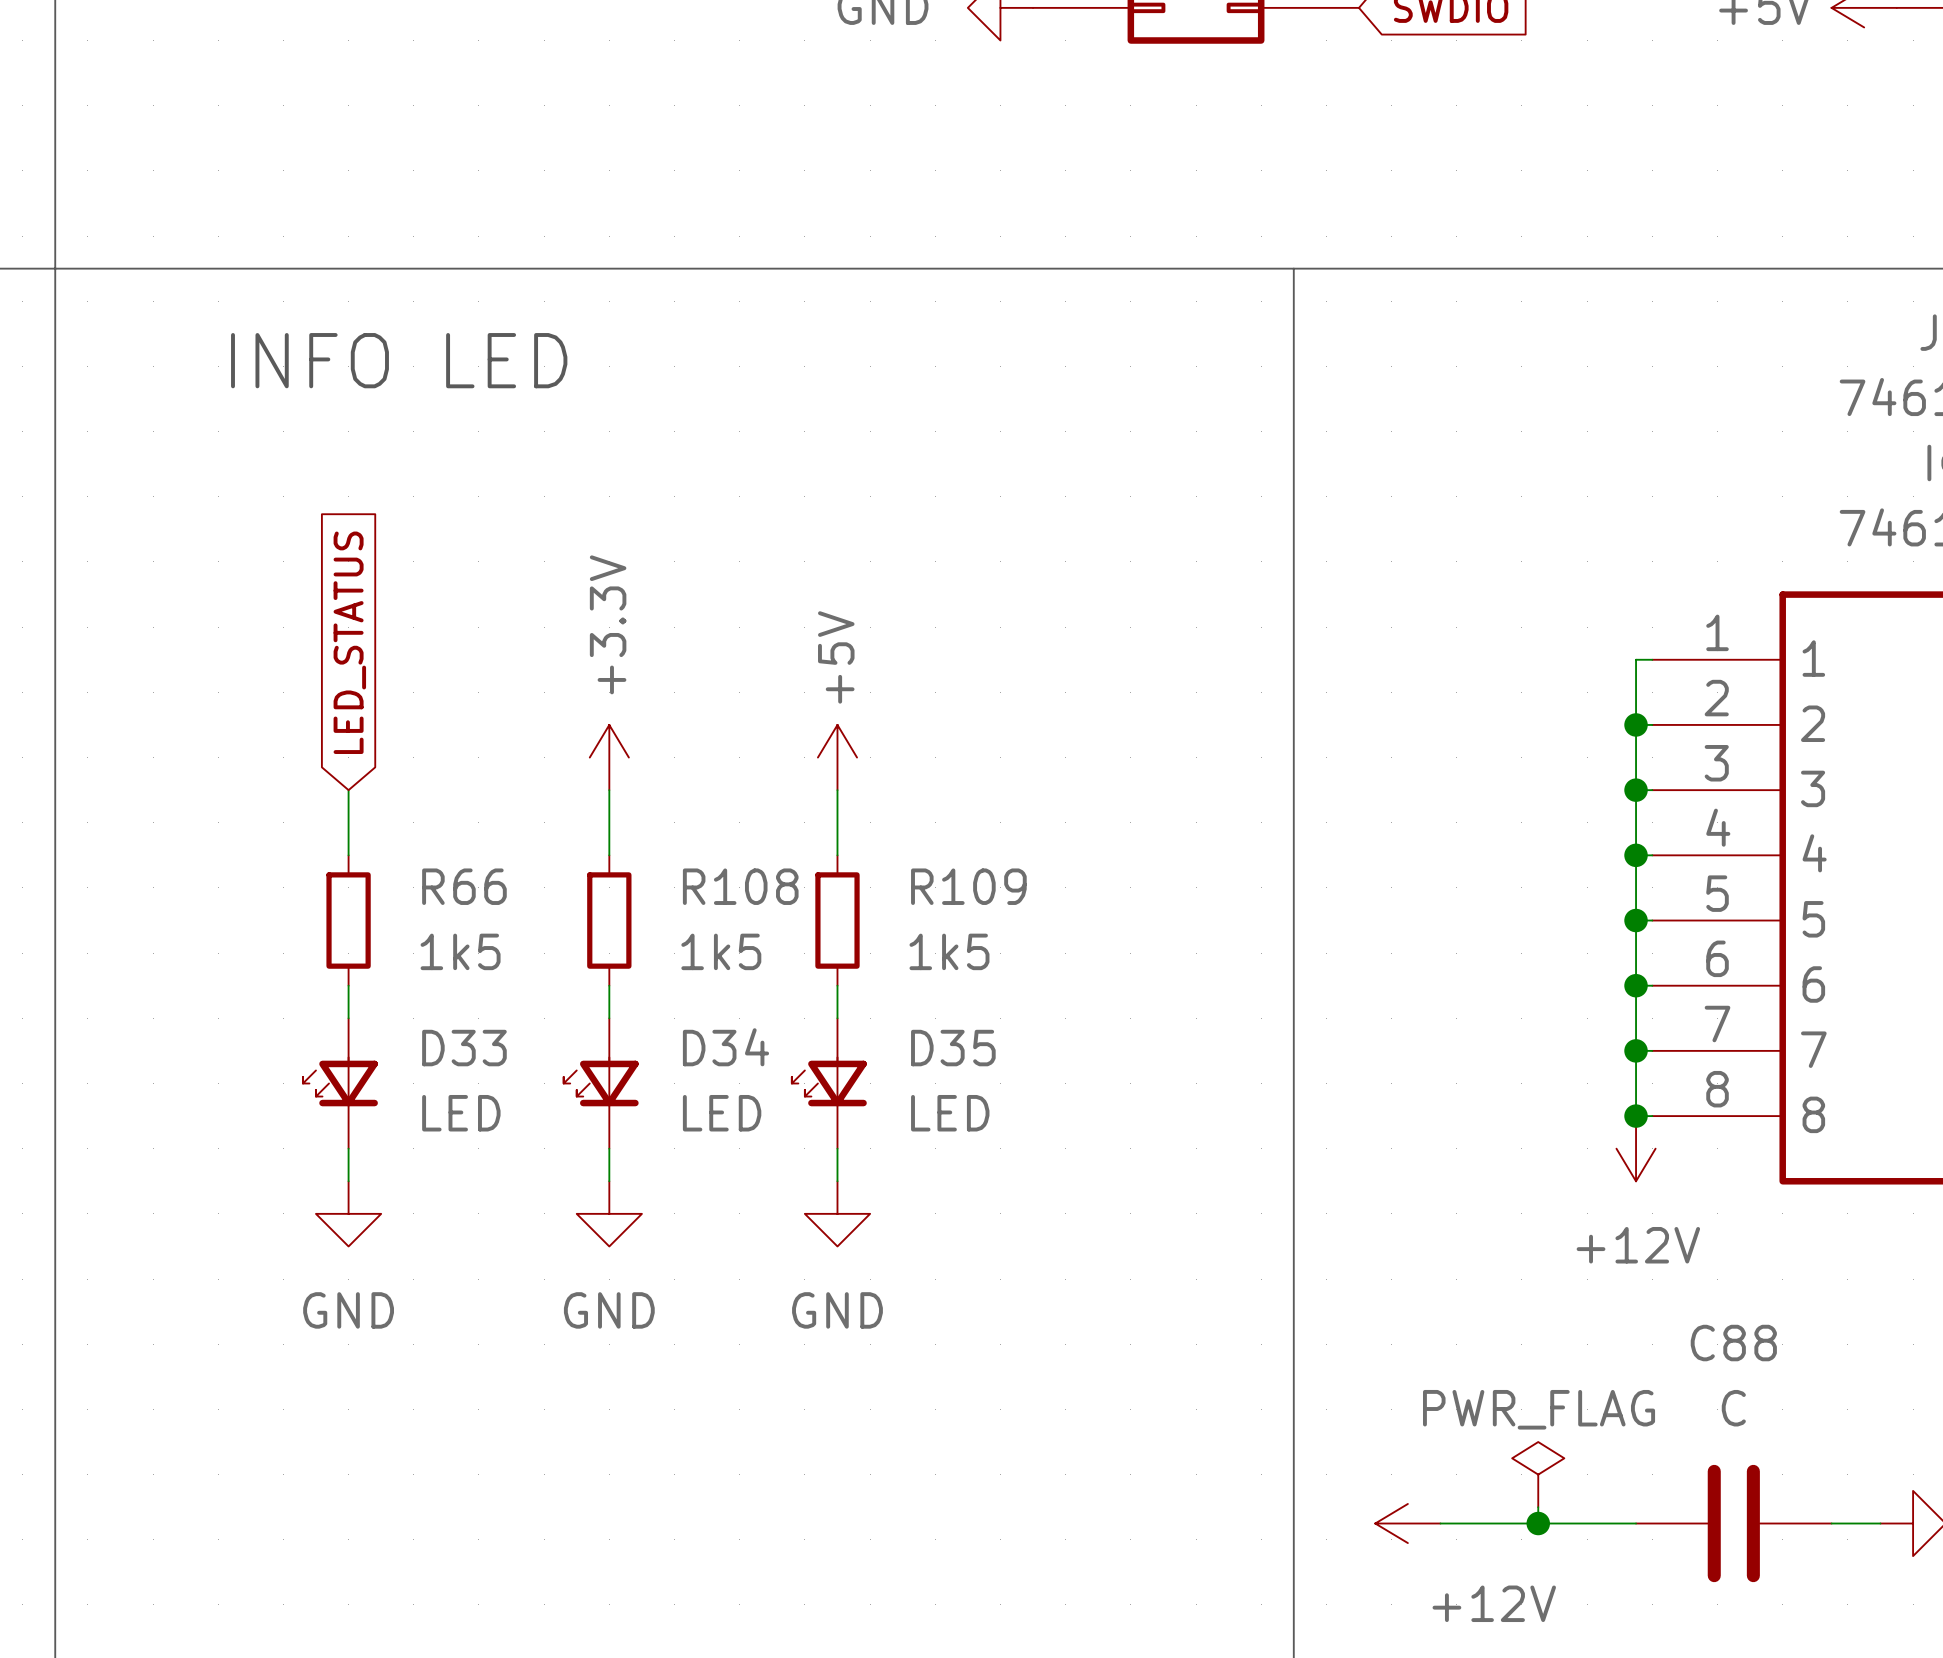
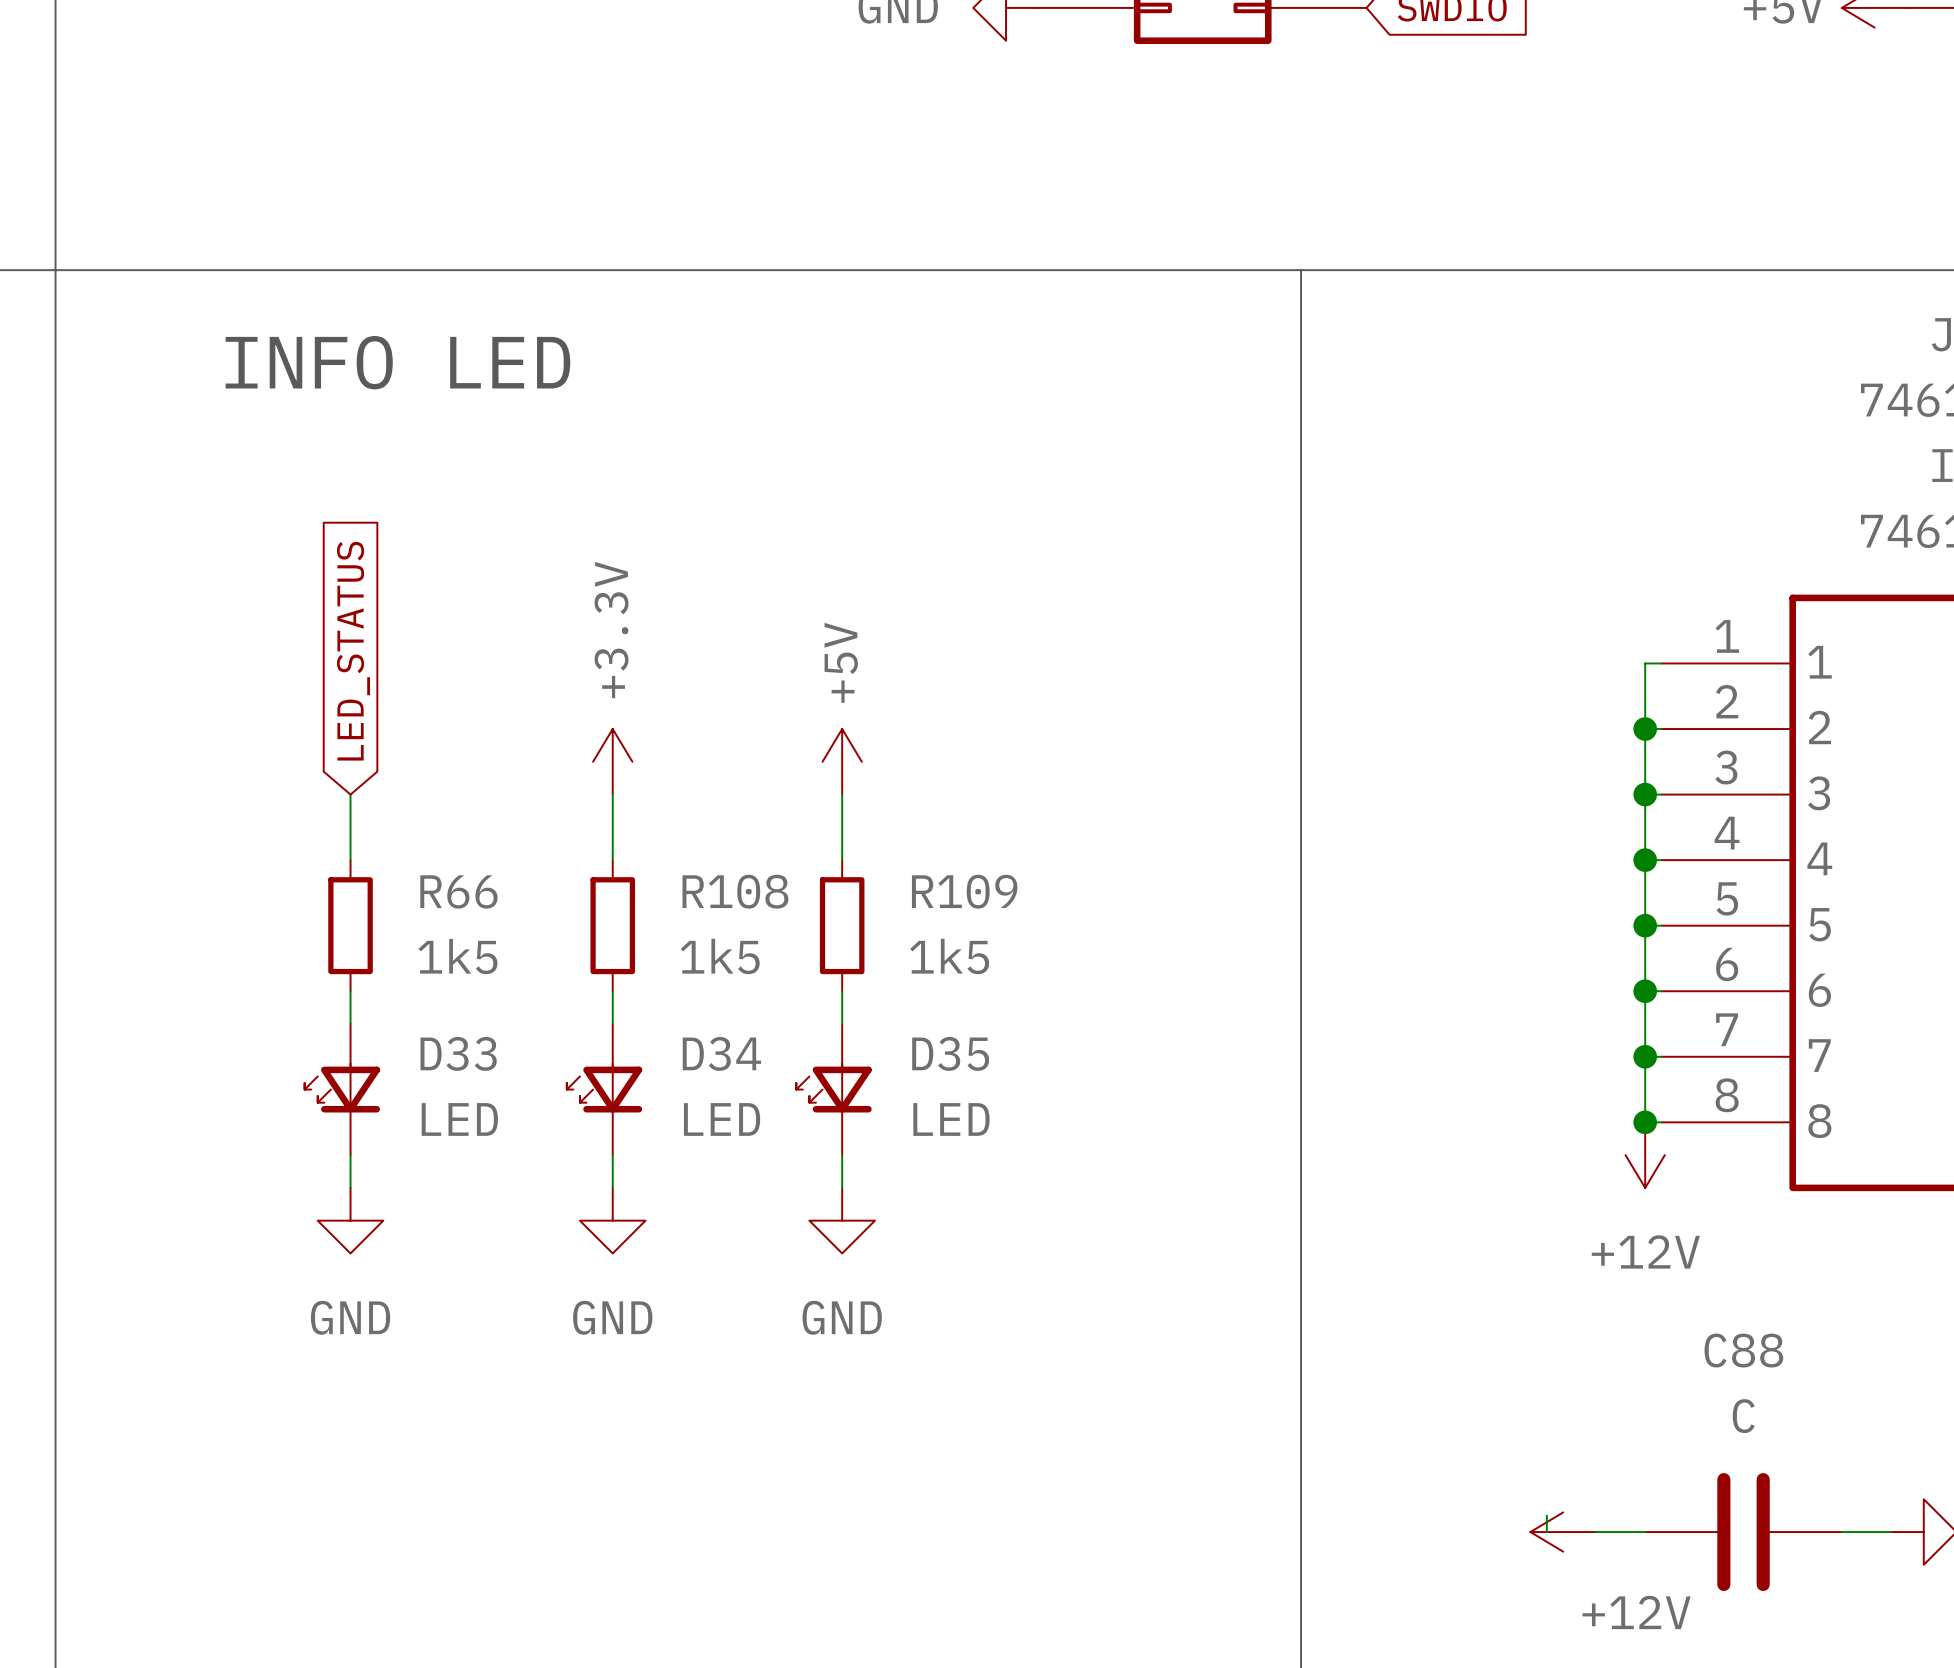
power symbol: PWR_FLAG (1538, 1474) -> none
power symbol position: +12V (1407, 1523) -> +12V (1563, 1532)
wire: (1440, 1523) (1587, 1523) -> none
junction: (1538, 1523) -> none

